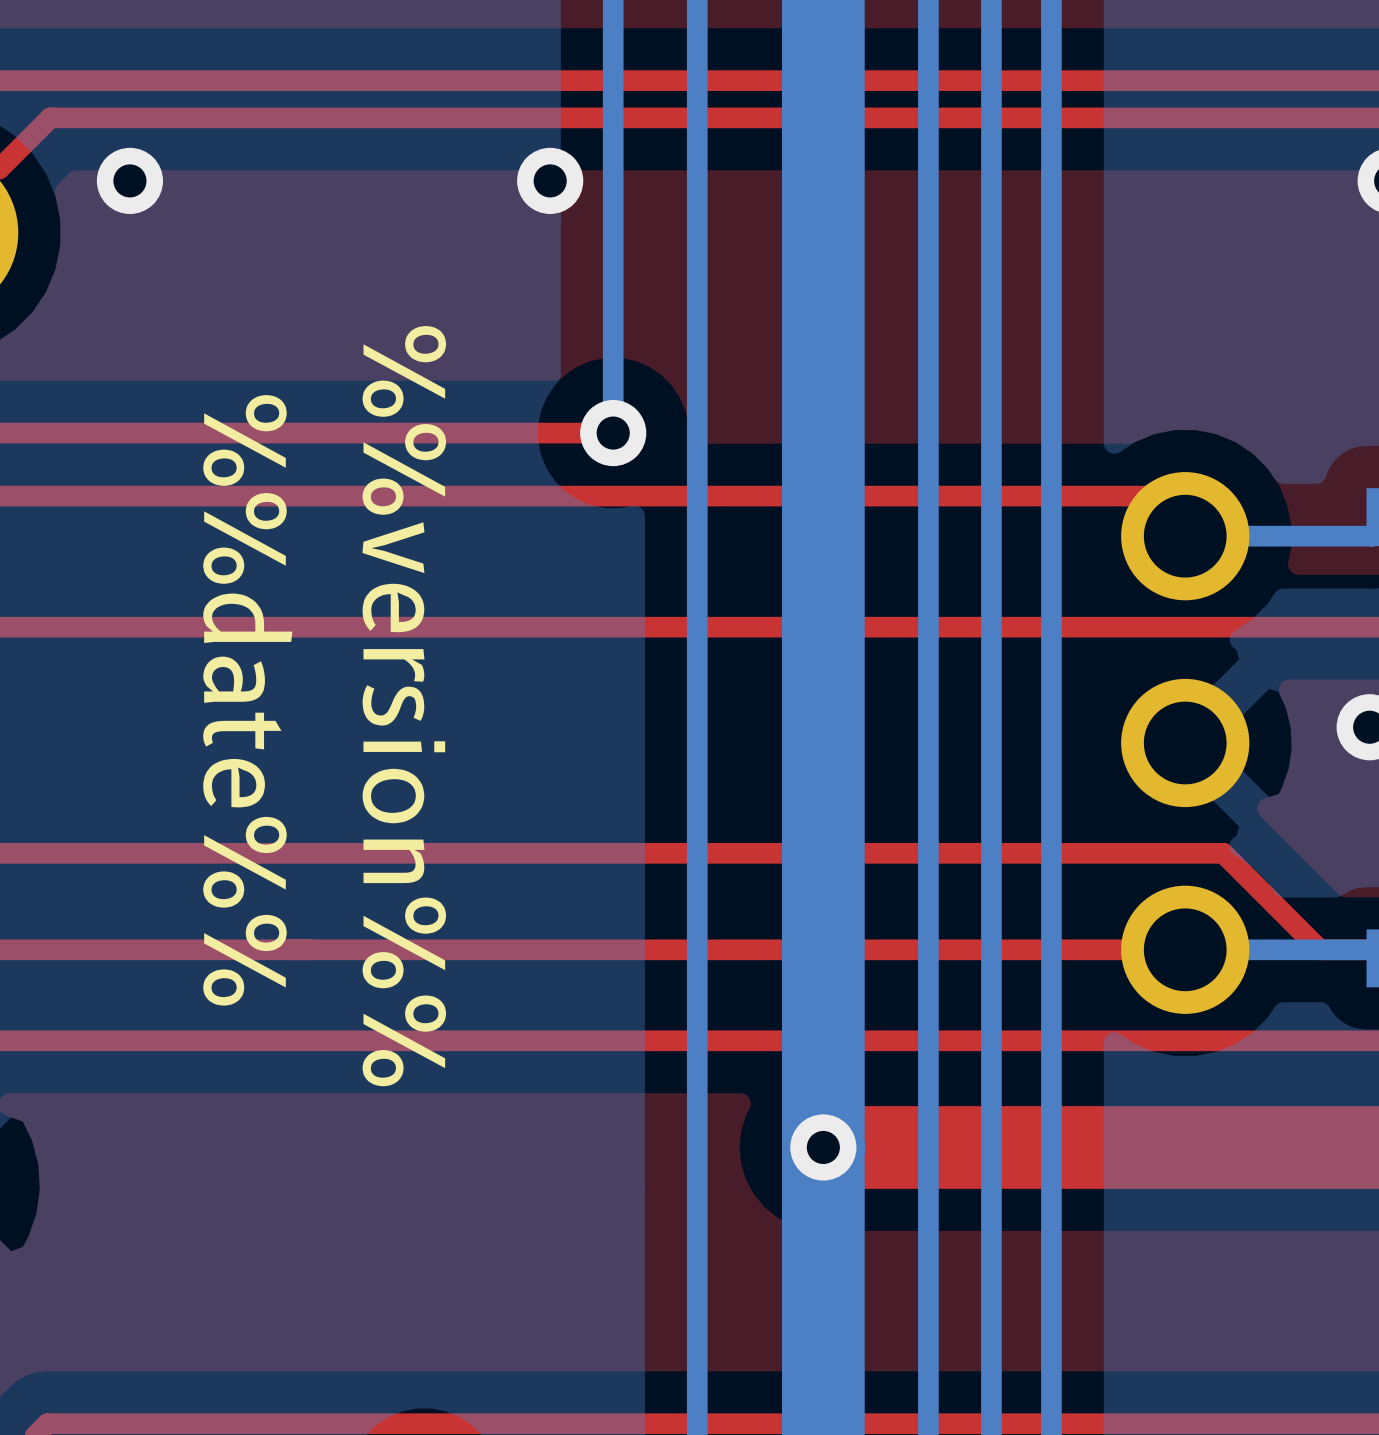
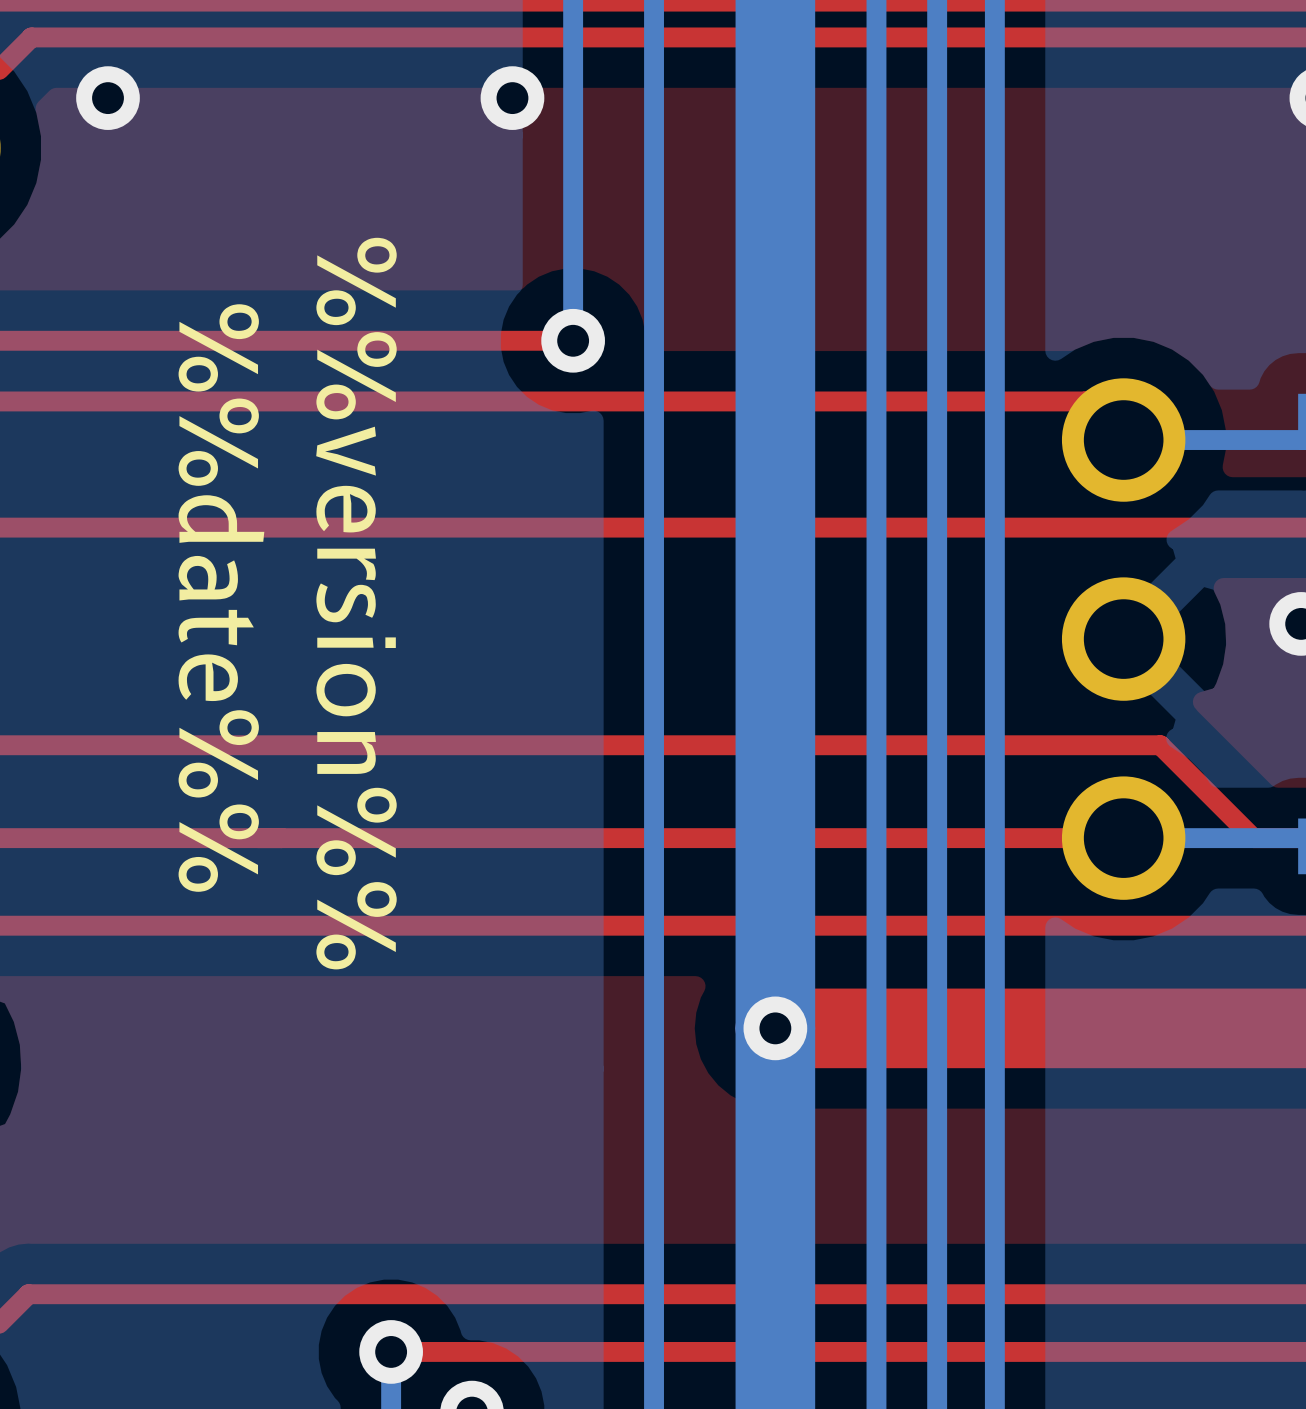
text position: %%version%% (404, 706) -> %%version%% (356, 603)

